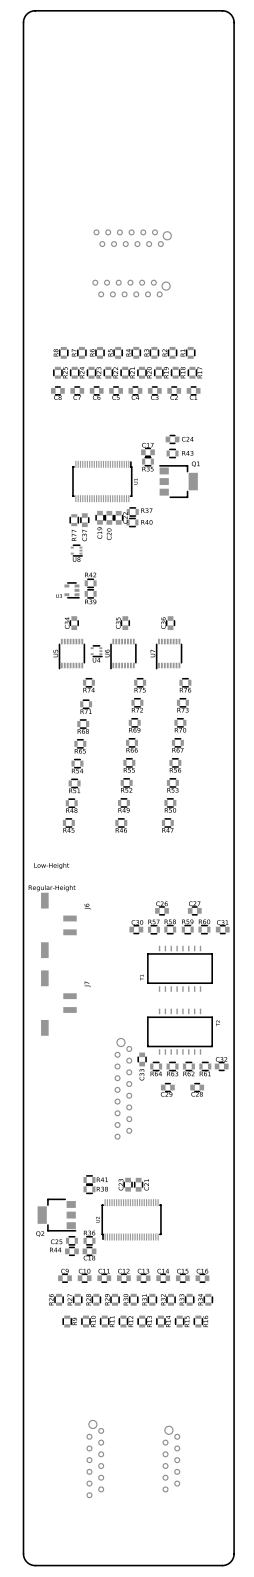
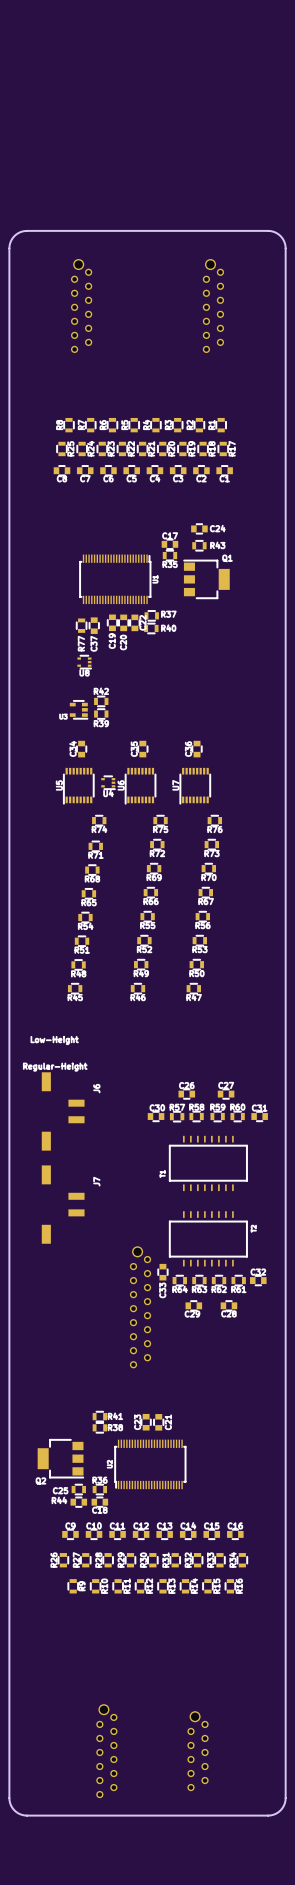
board edge: (35, 10) (222, 10) (230, 14) (233, 20) (234, 1553) (230, 1562) (223, 1565) (35, 1565) (28, 1563) (23, 1555) (23, 22) (26, 14) (35, 10) -> (268, 230) (280, 236) (285, 248) (285, 1800) (280, 1810) (268, 1815) (24, 1815) (13, 1808) (9, 1798) (9, 246) (16, 234) (26, 230) (268, 230)
part: (132, 238) -> none
part: none -> (81, 306)
part: none -> (213, 306)
part: (131, 288) -> none

